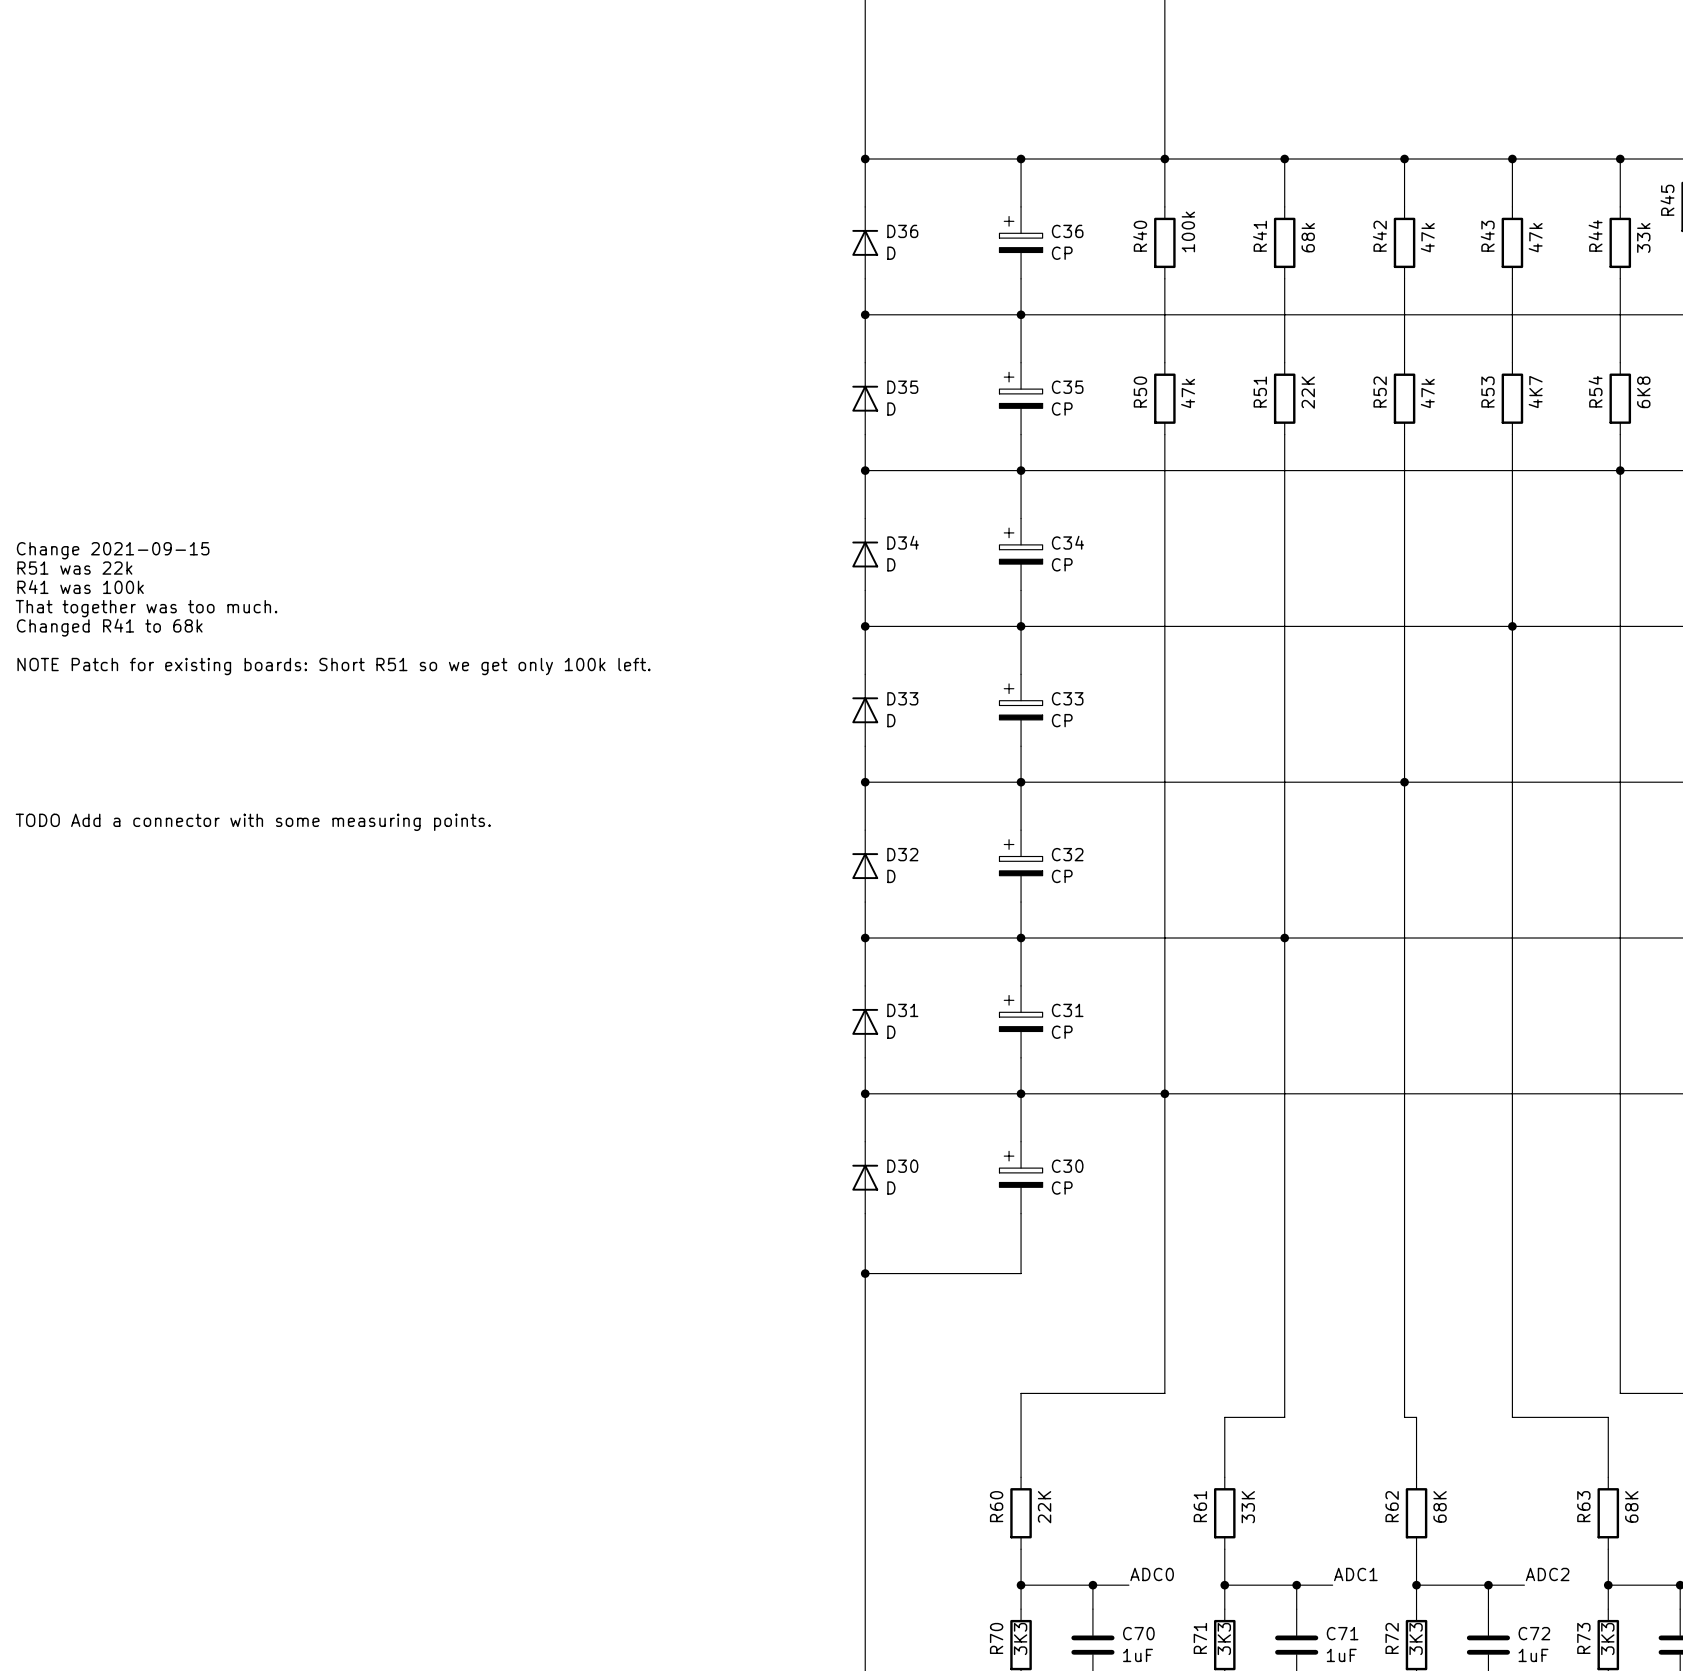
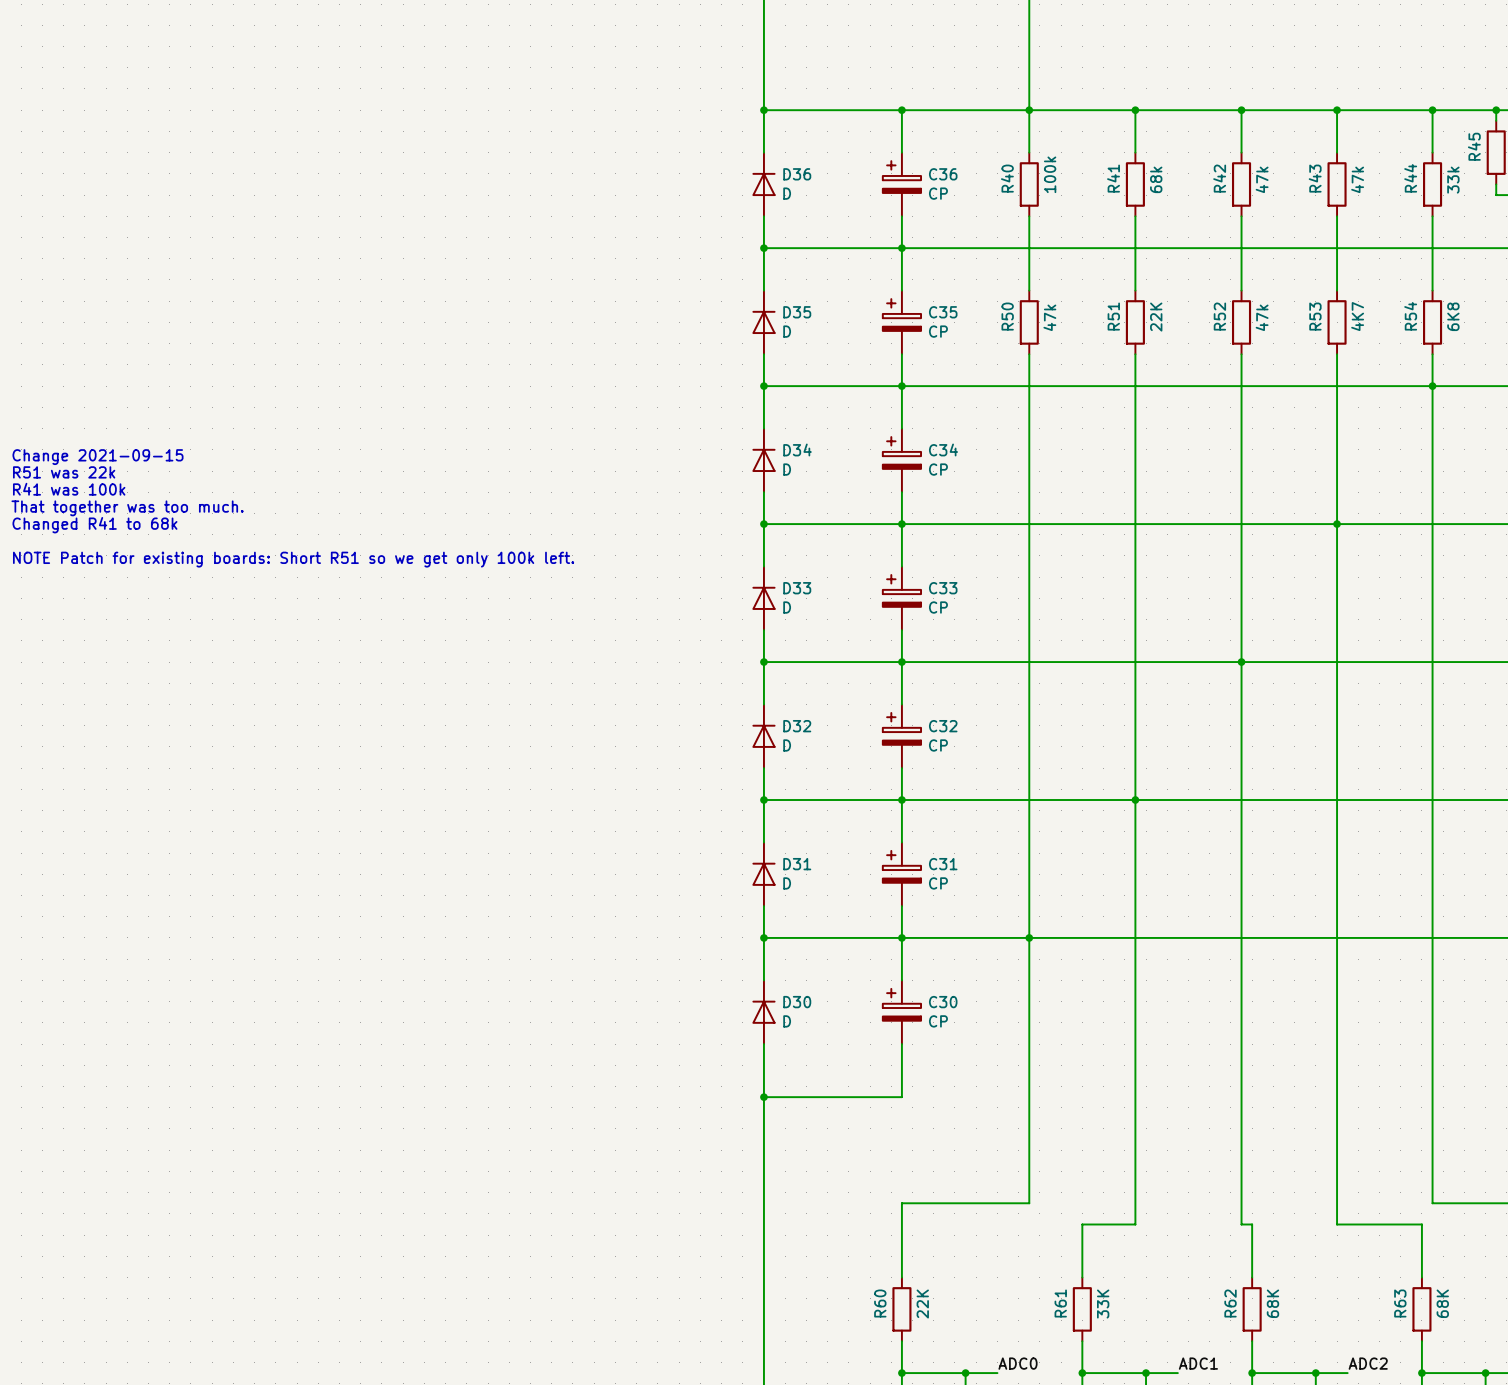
text: TODO Add a connector with some measuring points. (253, 822) -> none

